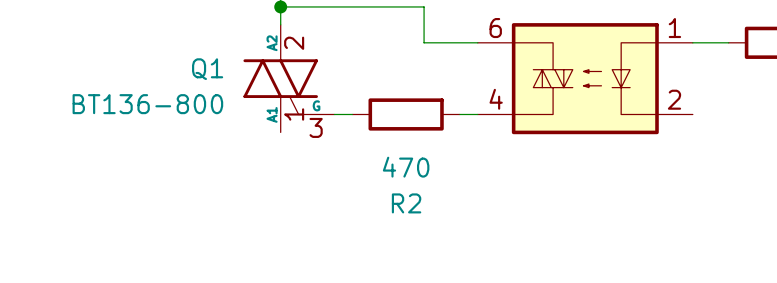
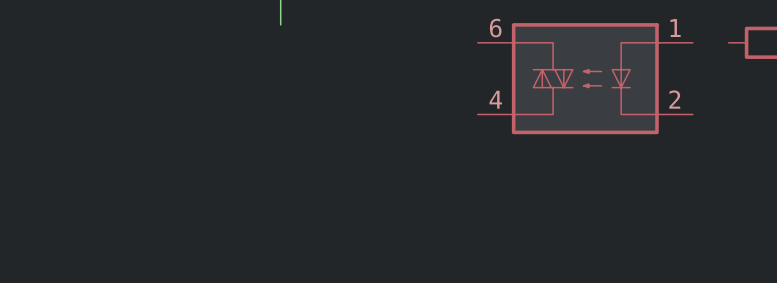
wire: (280, 6) (424, 6) (424, 42) (477, 42) -> none
junction: (280, 6) -> none
wire: (692, 42) (728, 42) -> none
Q1: BT136-800 (288, 78) -> none
wire: (334, 114) (352, 114) -> none
R2: 470 (406, 114) -> none
wire: (459, 114) (477, 114) -> none

